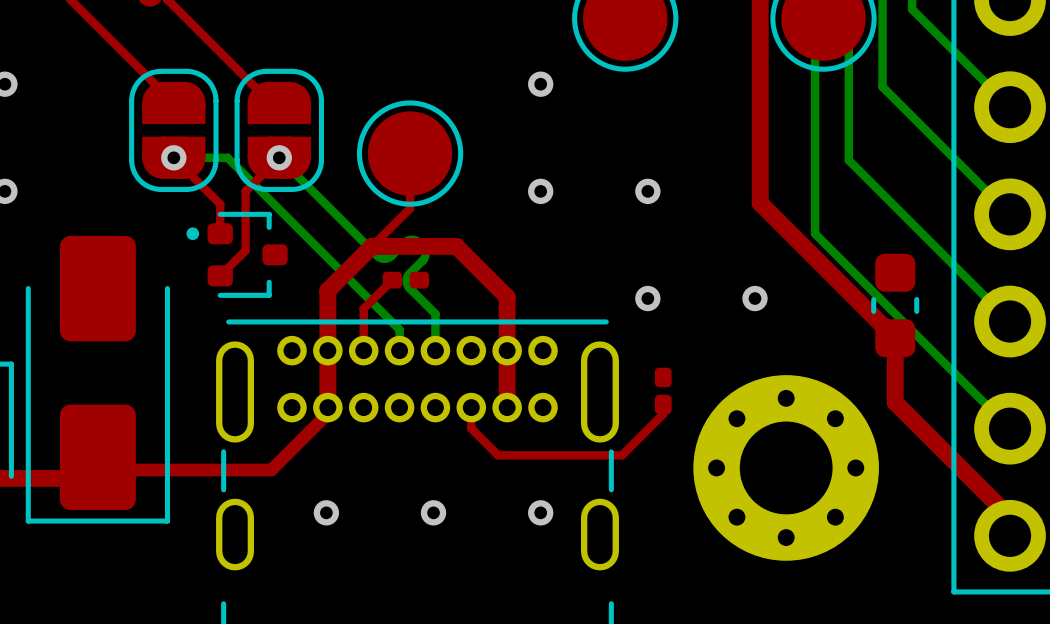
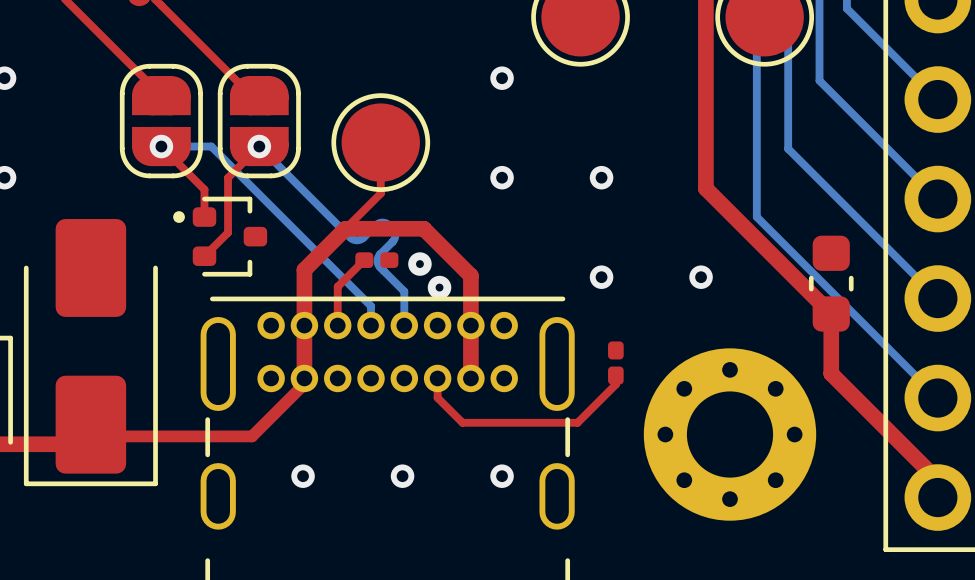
via: none -> (419, 264)
via: none -> (439, 287)

